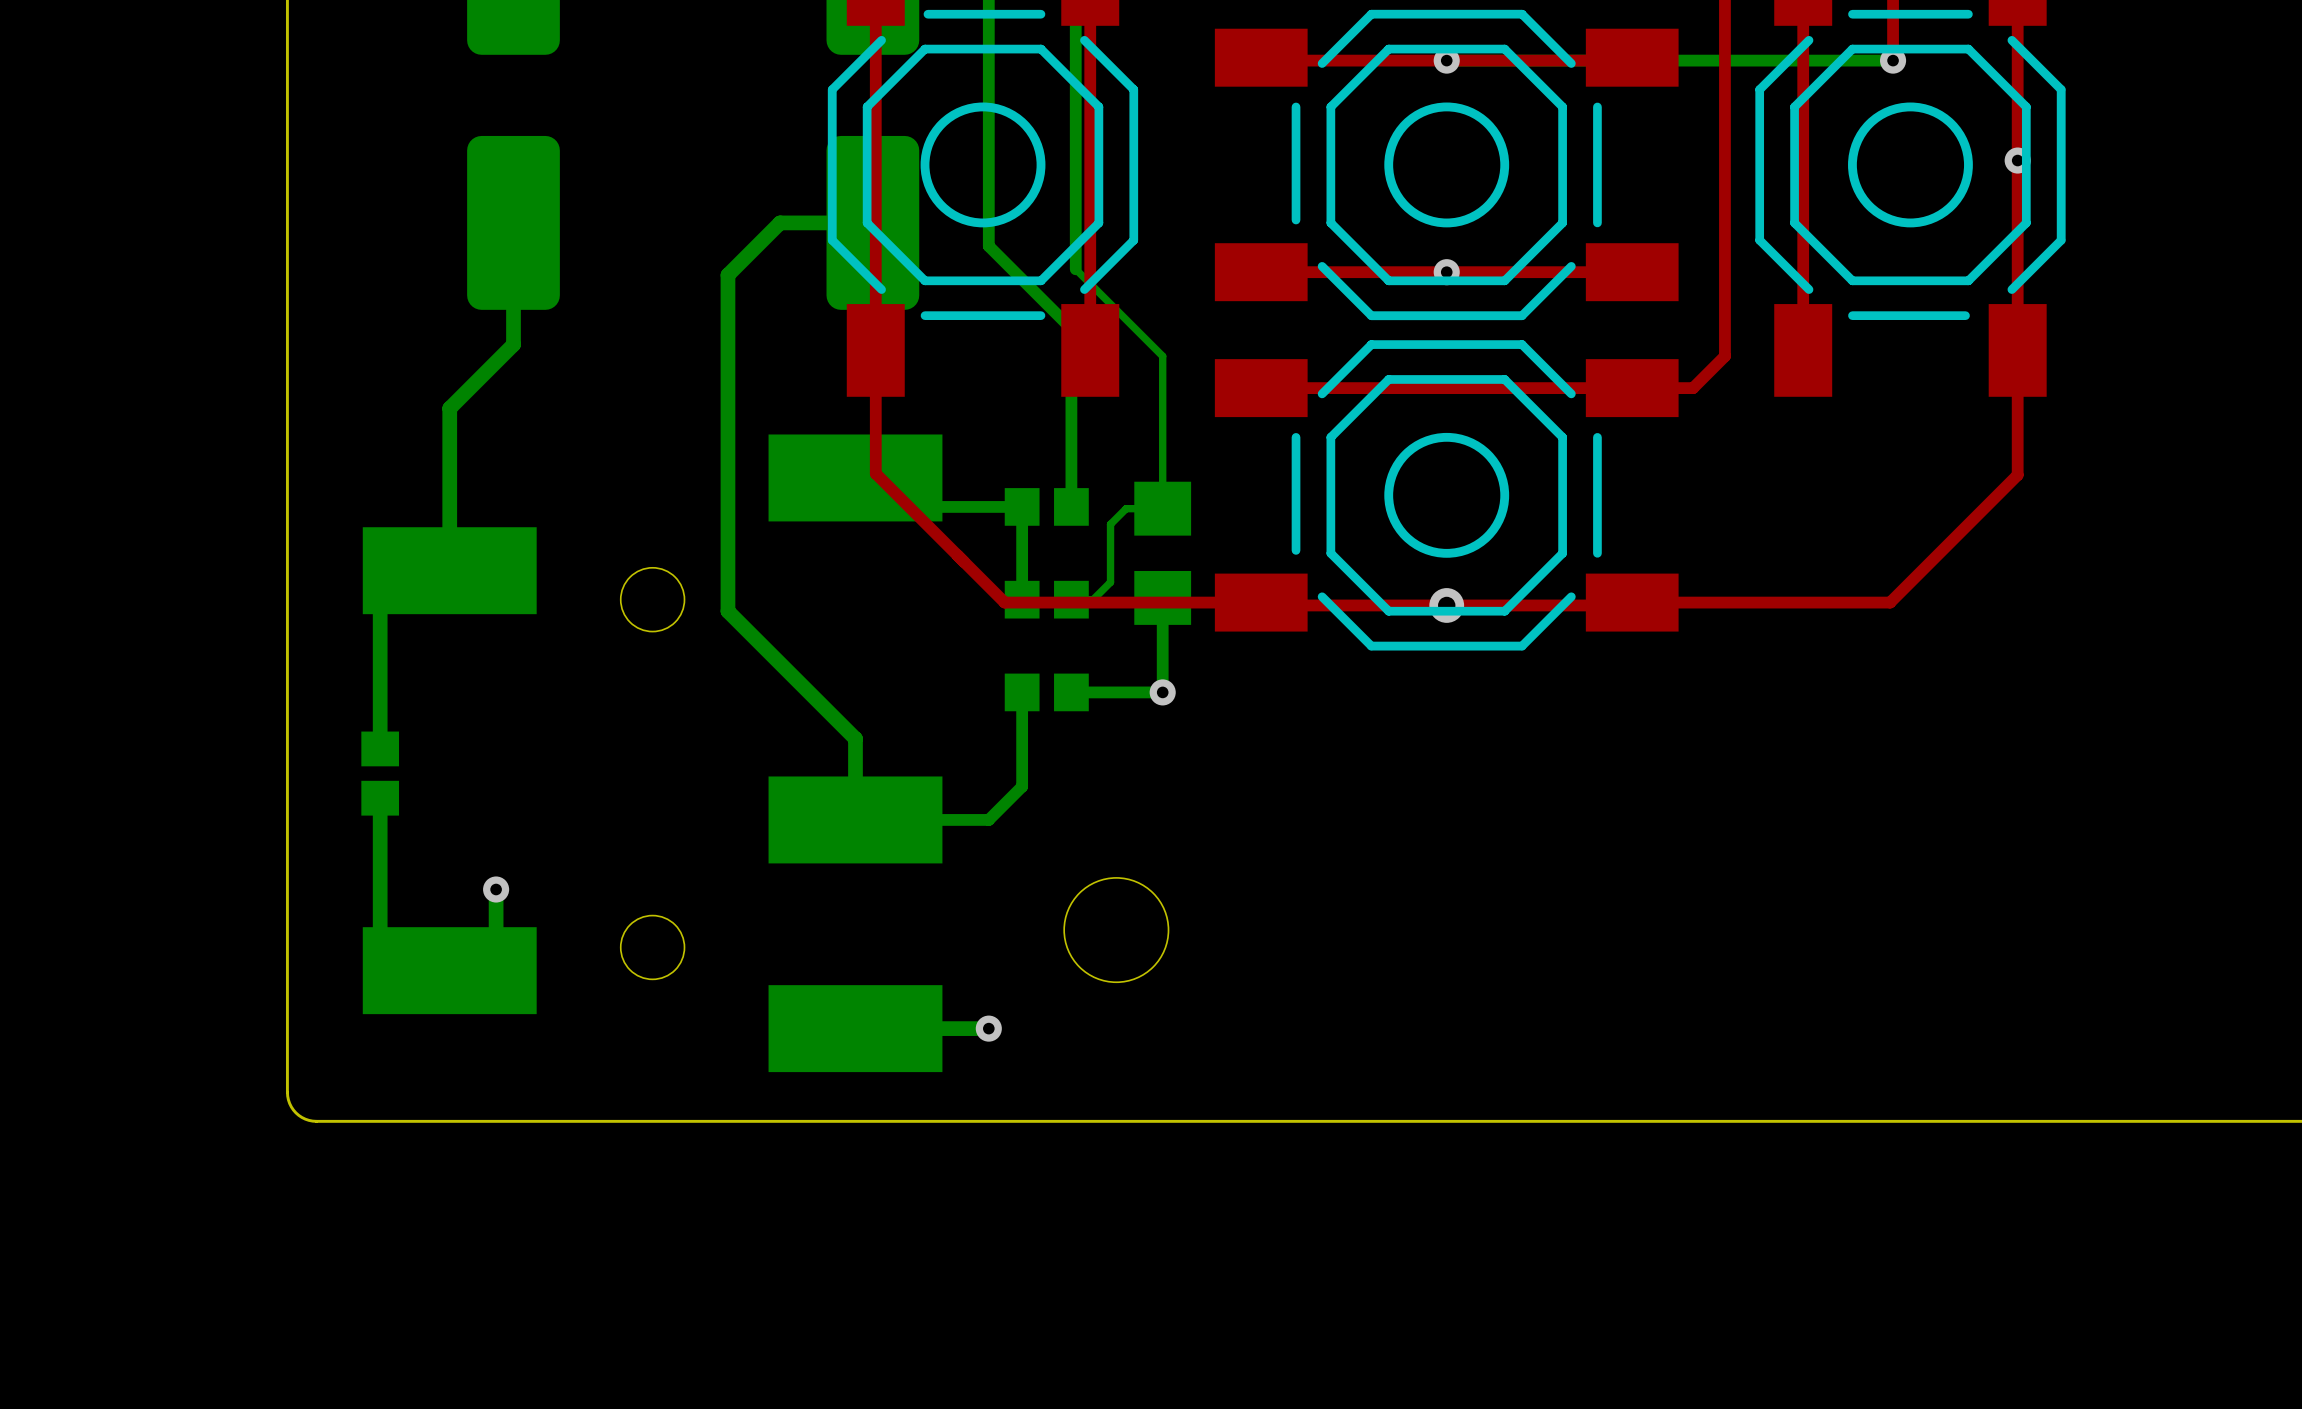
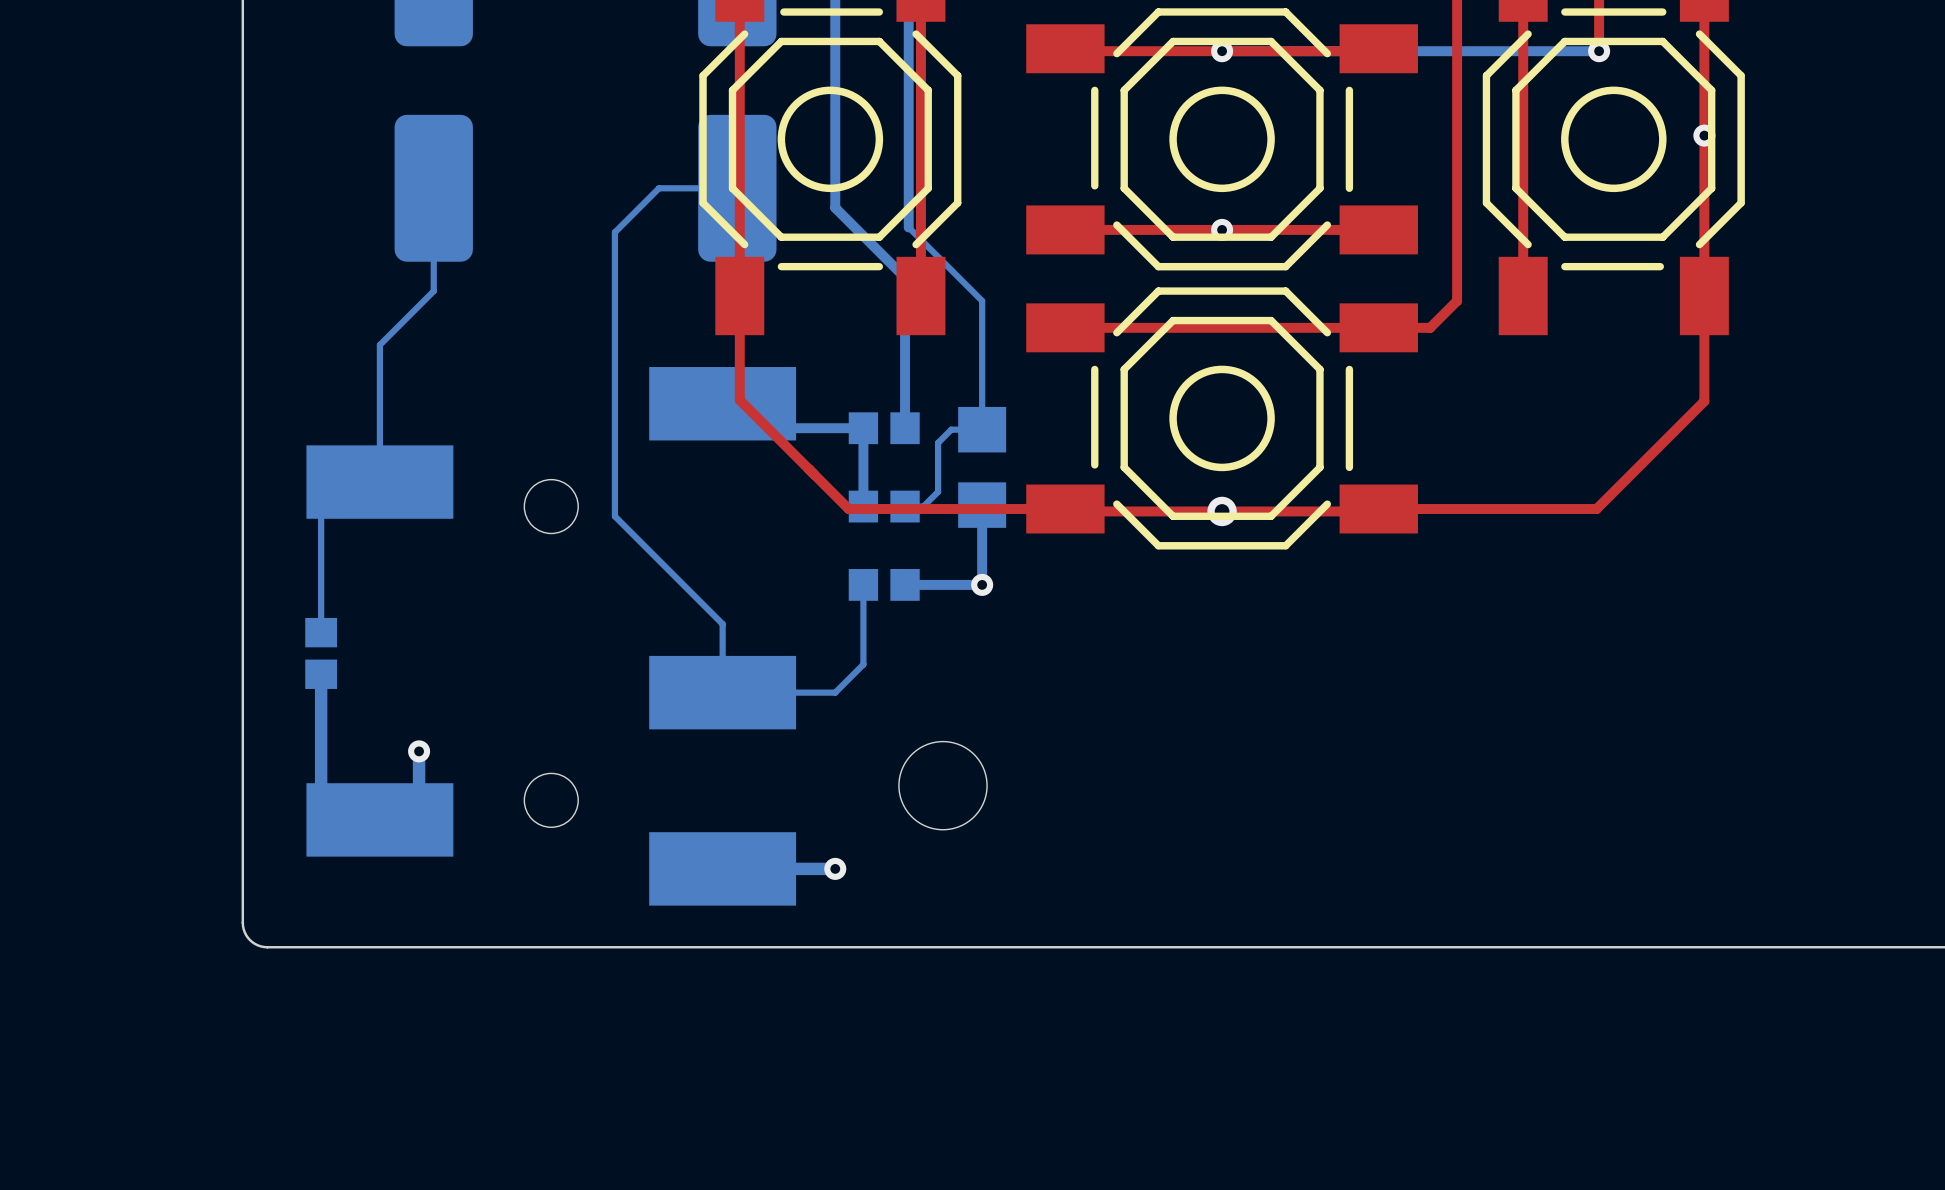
bottom track width: thick (513, 222) (513, 344) (449, 408) (449, 570) -> thin (433, 188) (433, 291) (379, 344) (379, 482)
bottom track width: thick (872, 222) (780, 222) (727, 275) (727, 611) (855, 738) (855, 819) (988, 819) (1022, 786) (1022, 692) -> thin (737, 188) (659, 188) (614, 232) (614, 516) (722, 624) (722, 692) (835, 692) (863, 664) (863, 584)
bottom track width: thick (380, 582) (380, 748) -> thin (321, 491) (321, 632)

